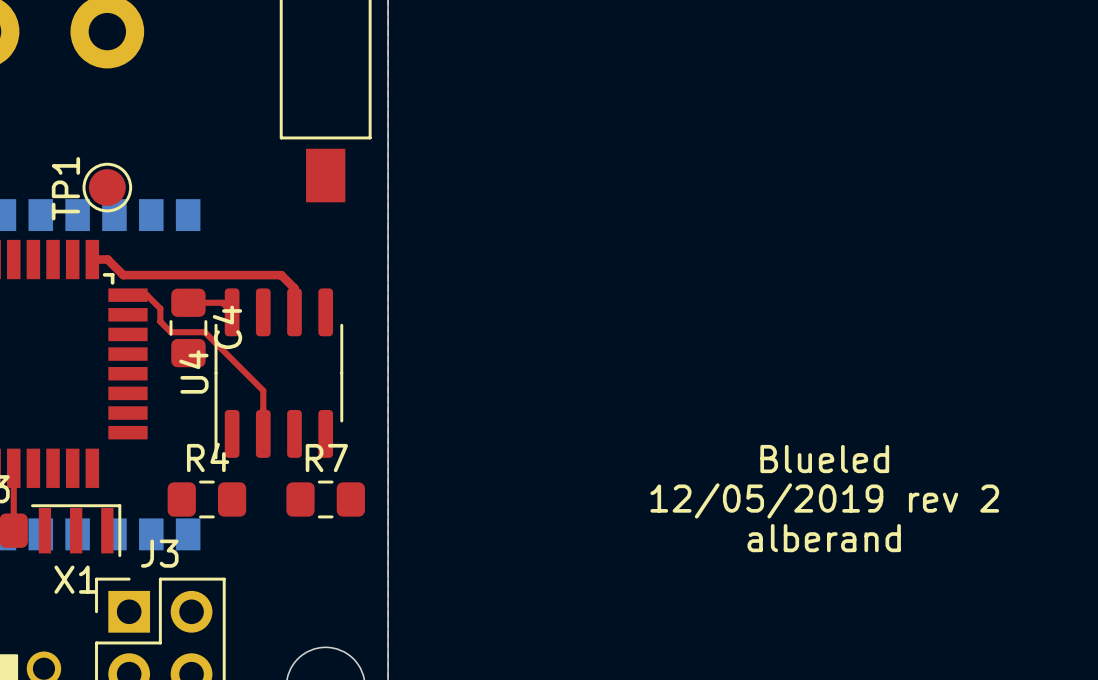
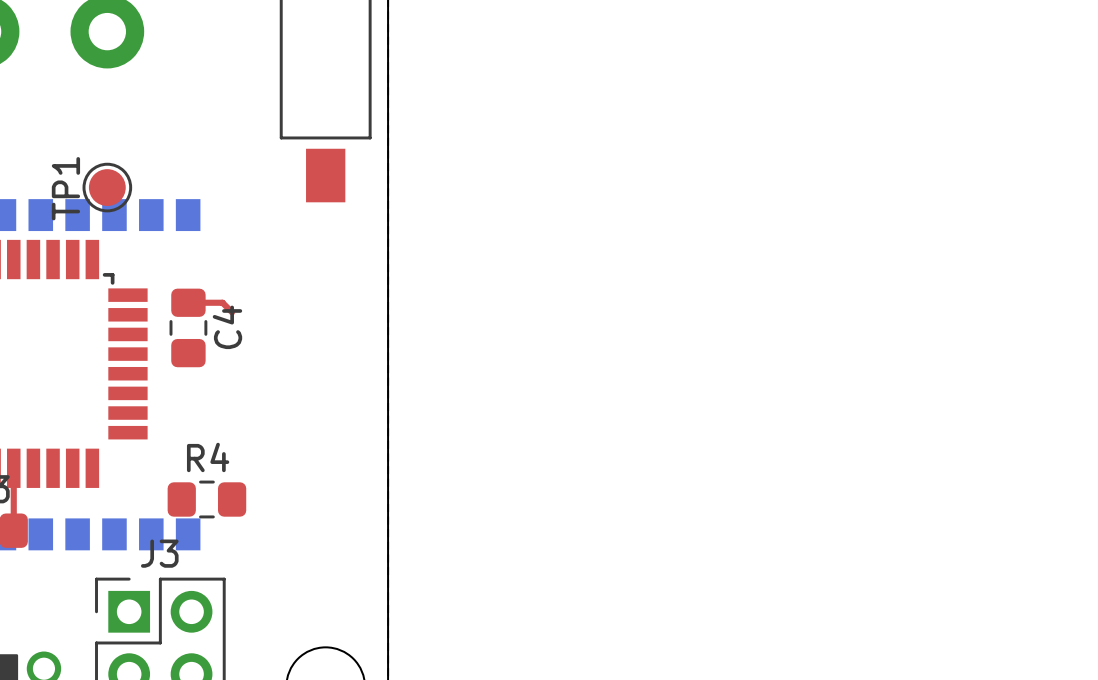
top track: (92, 259) (107, 259) (123, 275) (281, 275) (294, 288) (294, 312) -> none
top track: (127, 295) (146, 295) (160, 308) (160, 321) (170, 332) (204, 332) (263, 390) (263, 433) -> none
U4: (278, 373) -> none
text: Blueled (824, 459) -> none
R7: (325, 499) -> none
text: 12/05/2019 rev 2 (824, 500) -> none
X1: (76, 530) -> none
text: alberand (824, 538) -> none

